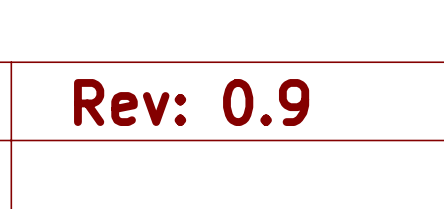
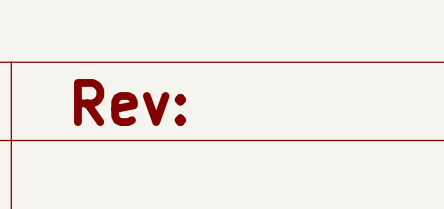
title block: Rev: 0.9 (191, 102) -> Rev: (130, 102)

